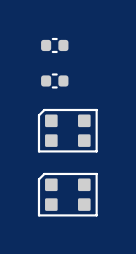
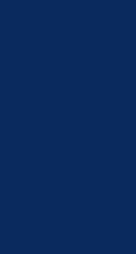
part: (54, 45) -> none
part: (54, 80) -> none
part: (67, 130) -> none
part: (67, 194) -> none

